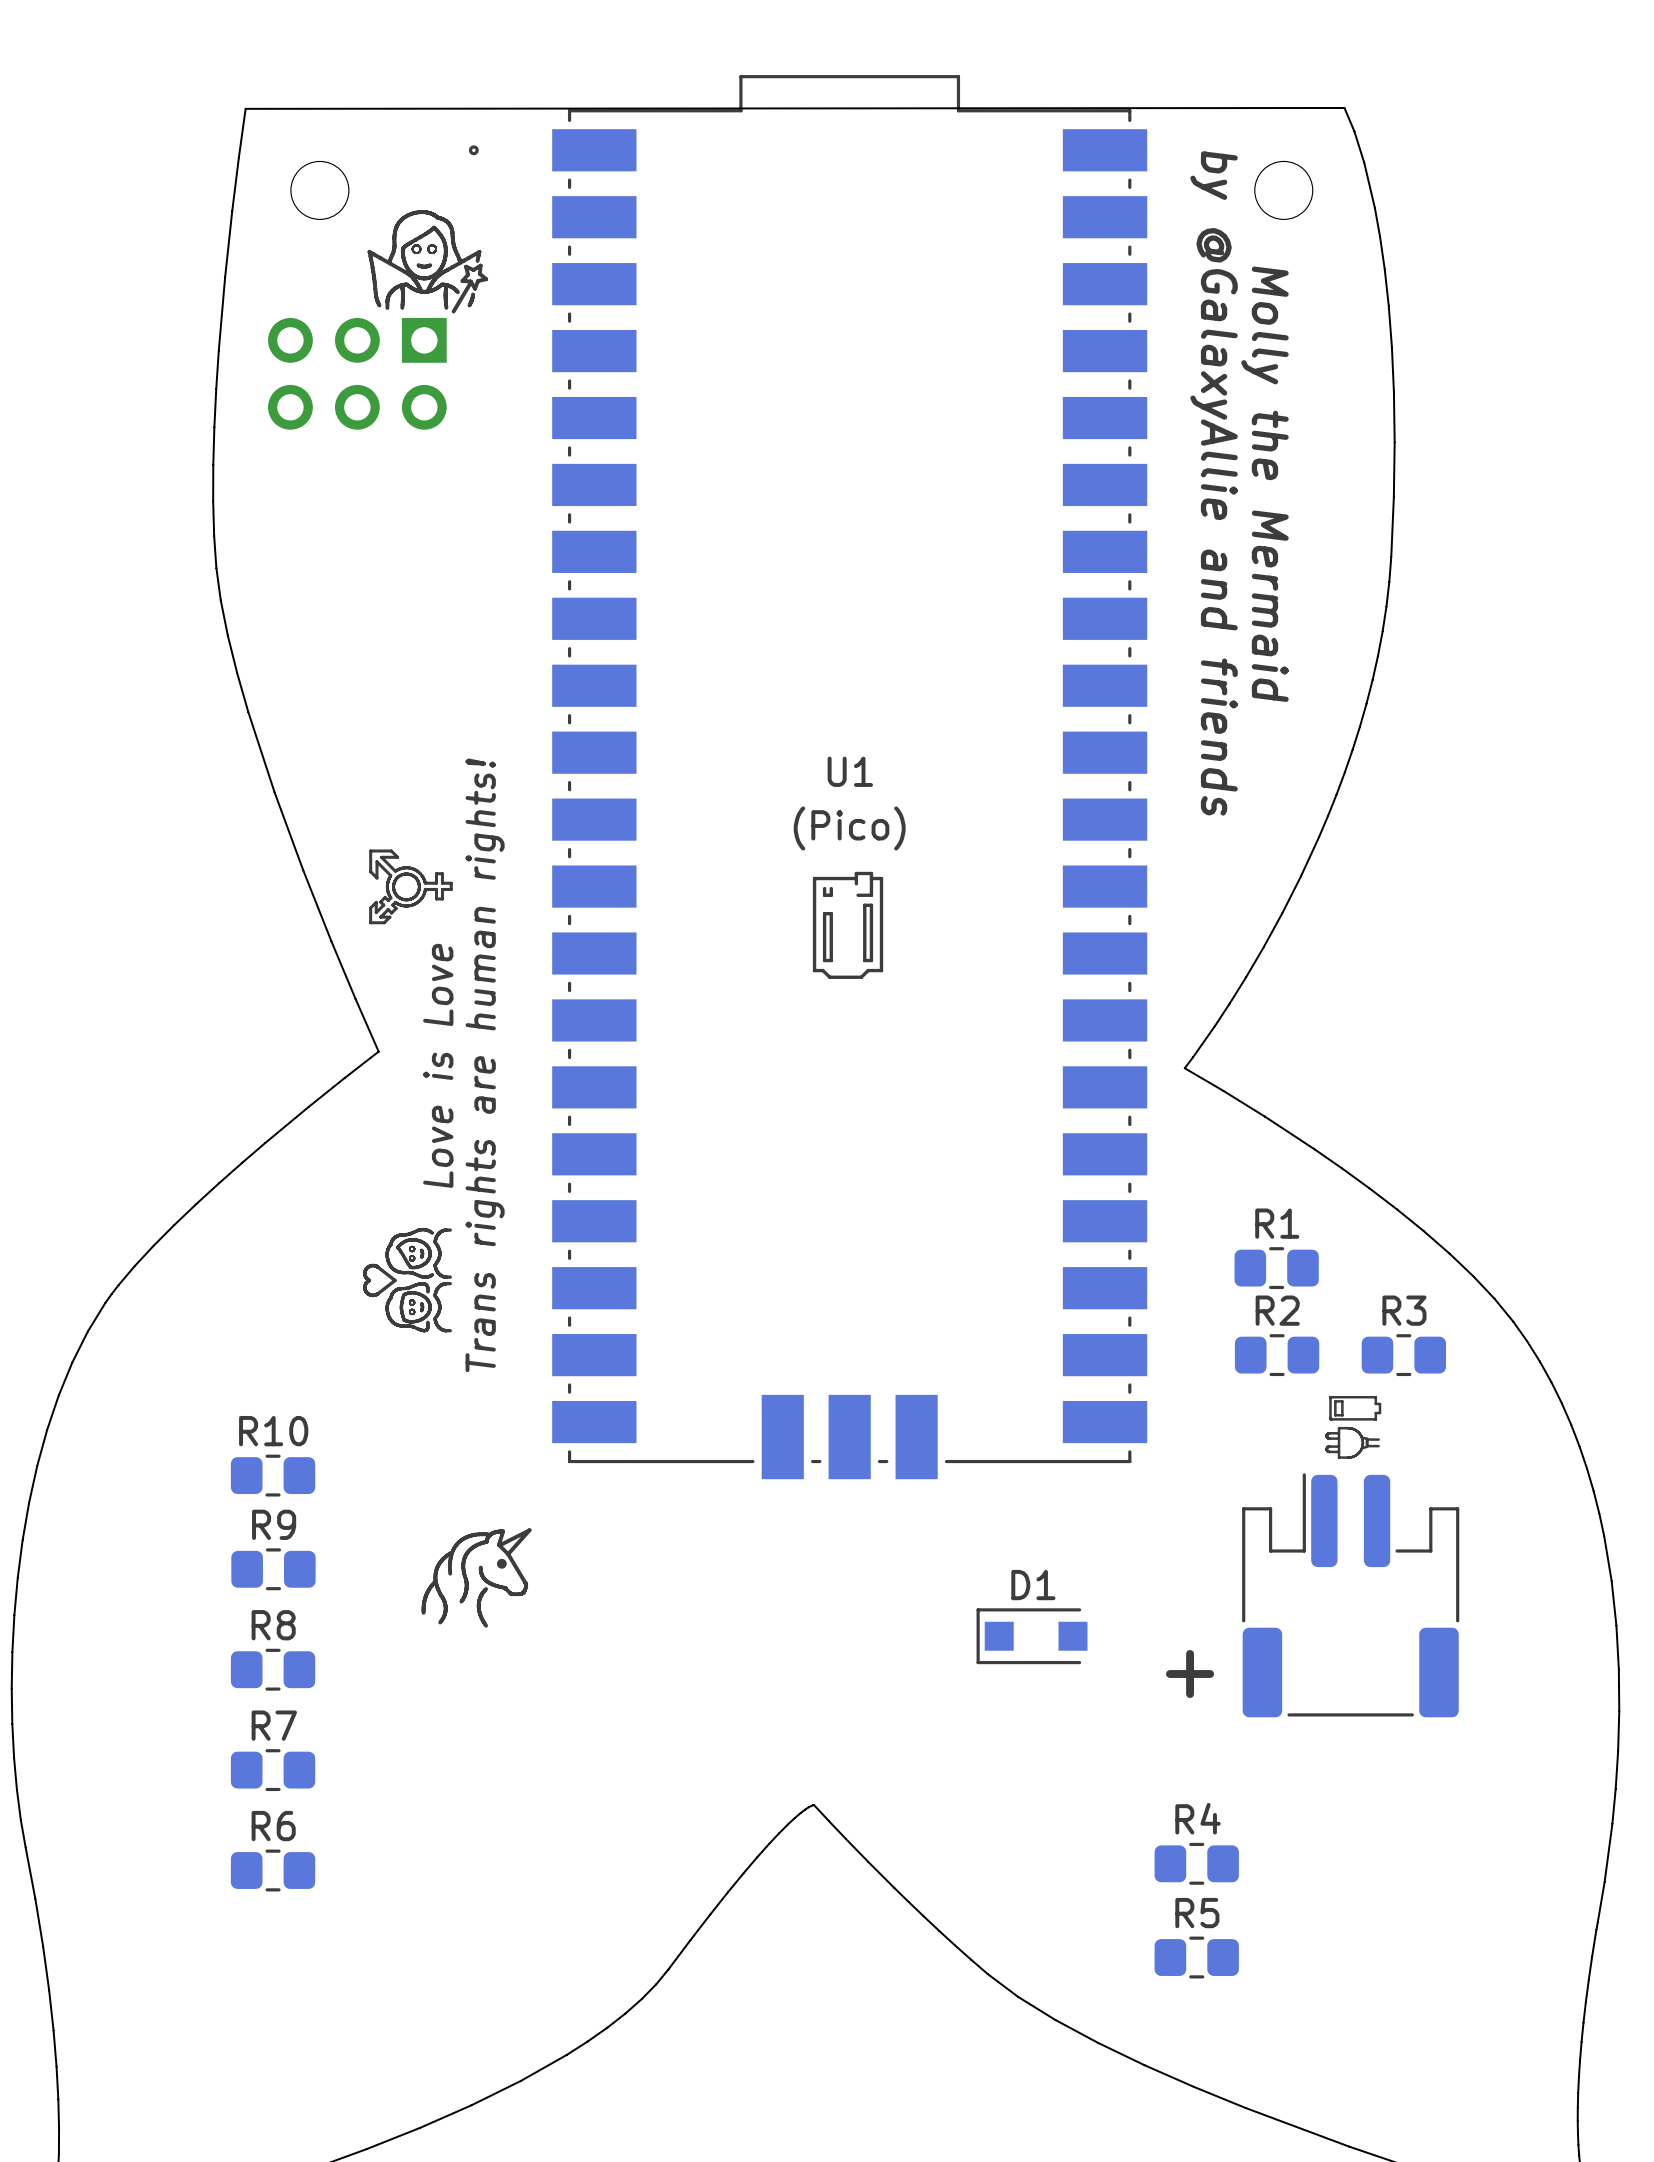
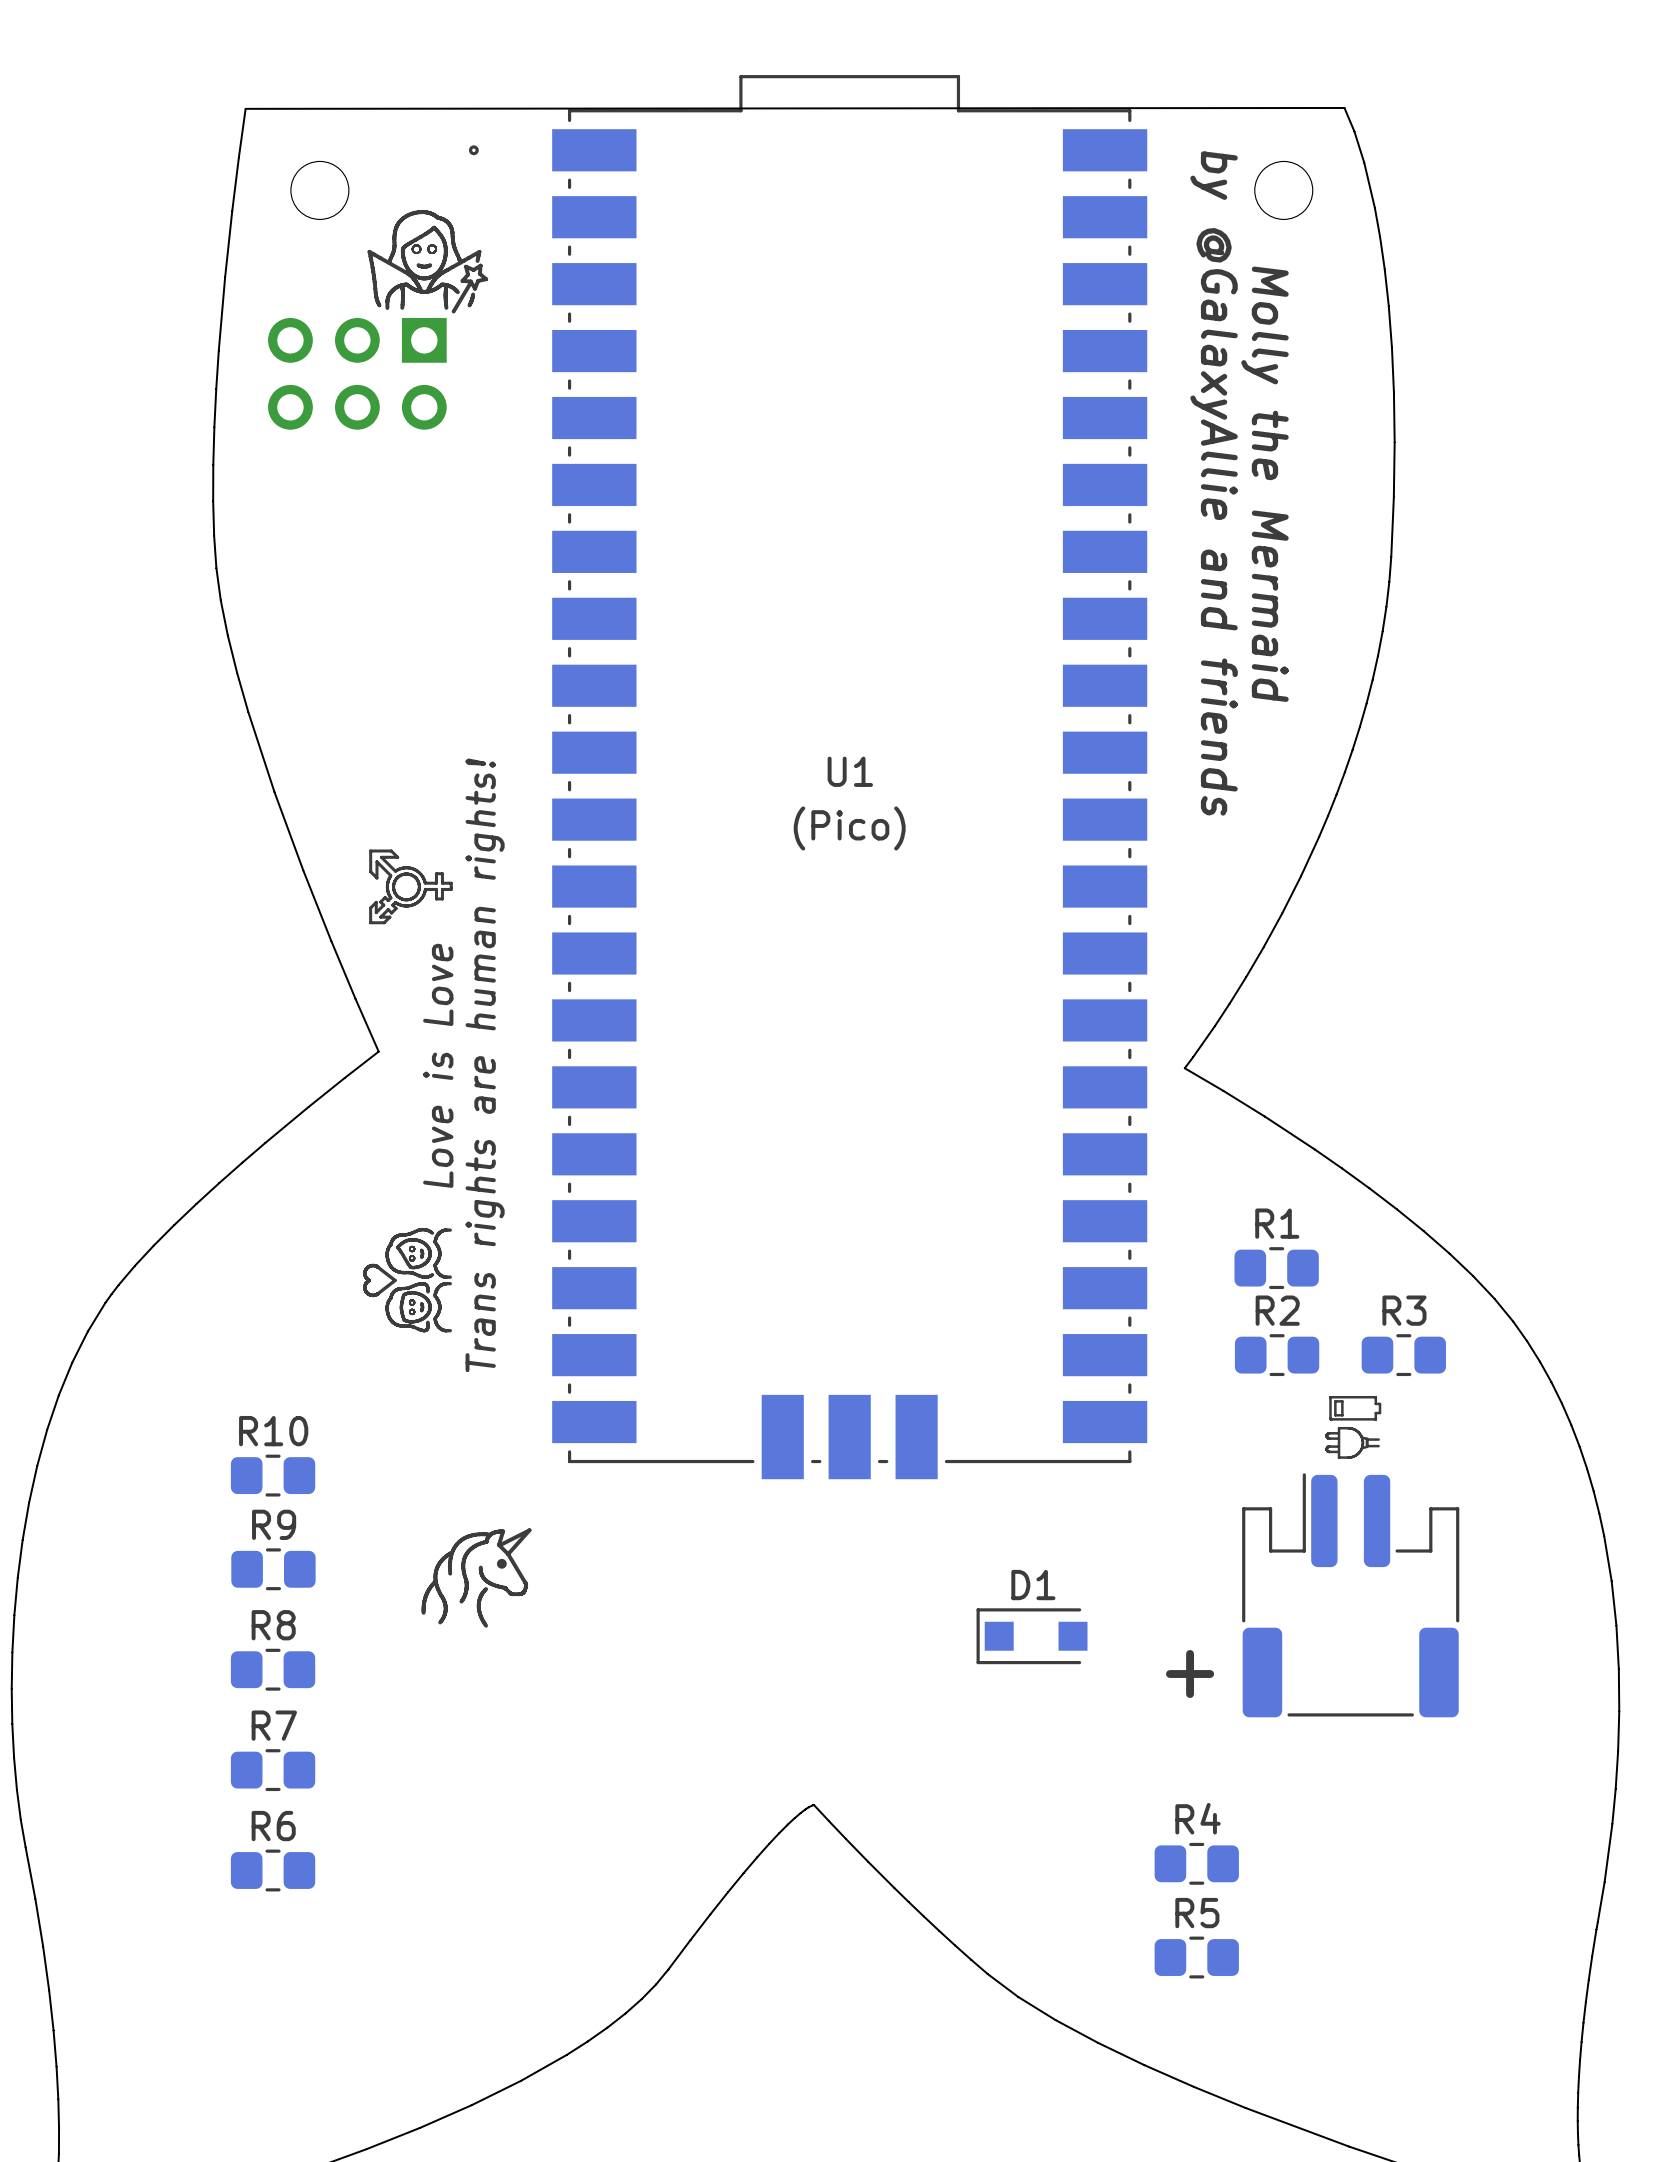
line: (871, 878) (881, 878) (881, 970) (868, 970) (861, 977) (829, 977) (822, 970) (814, 970) (814, 878) (856, 878) -> none
line: (856, 883) (856, 873) (871, 873) (871, 895) (858, 895) -> none
line: (831, 888) (831, 895) (824, 895) (824, 888) -> none
line: (871, 905) (871, 960) (864, 960) (864, 905) (871, 905) -> none
line: (831, 913) (831, 960) (824, 960) (824, 913) (831, 913) -> none

